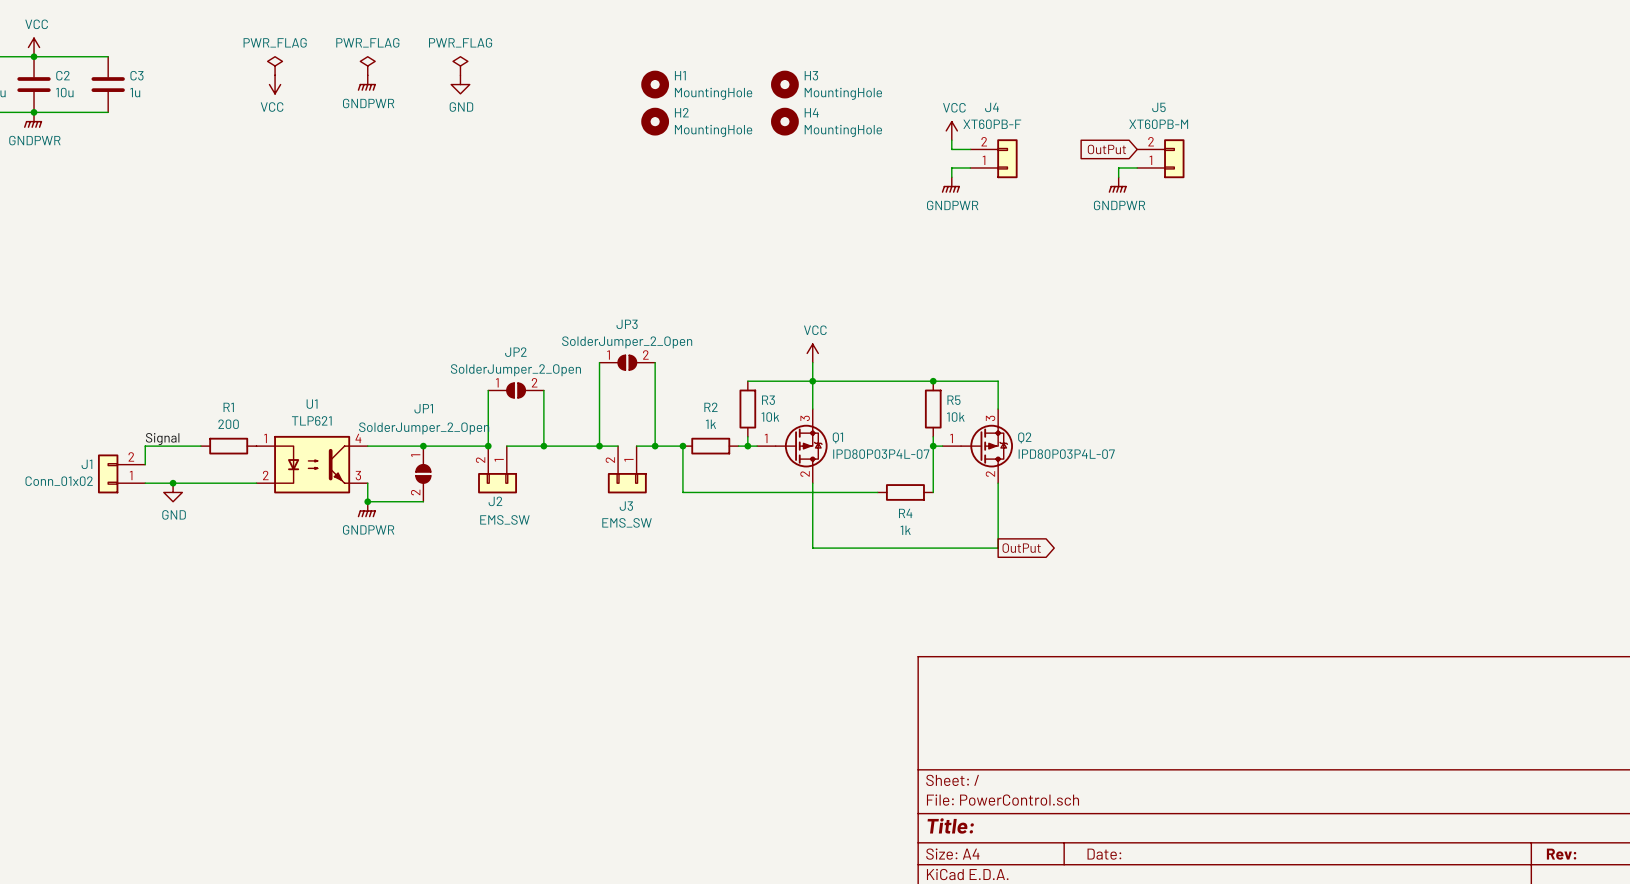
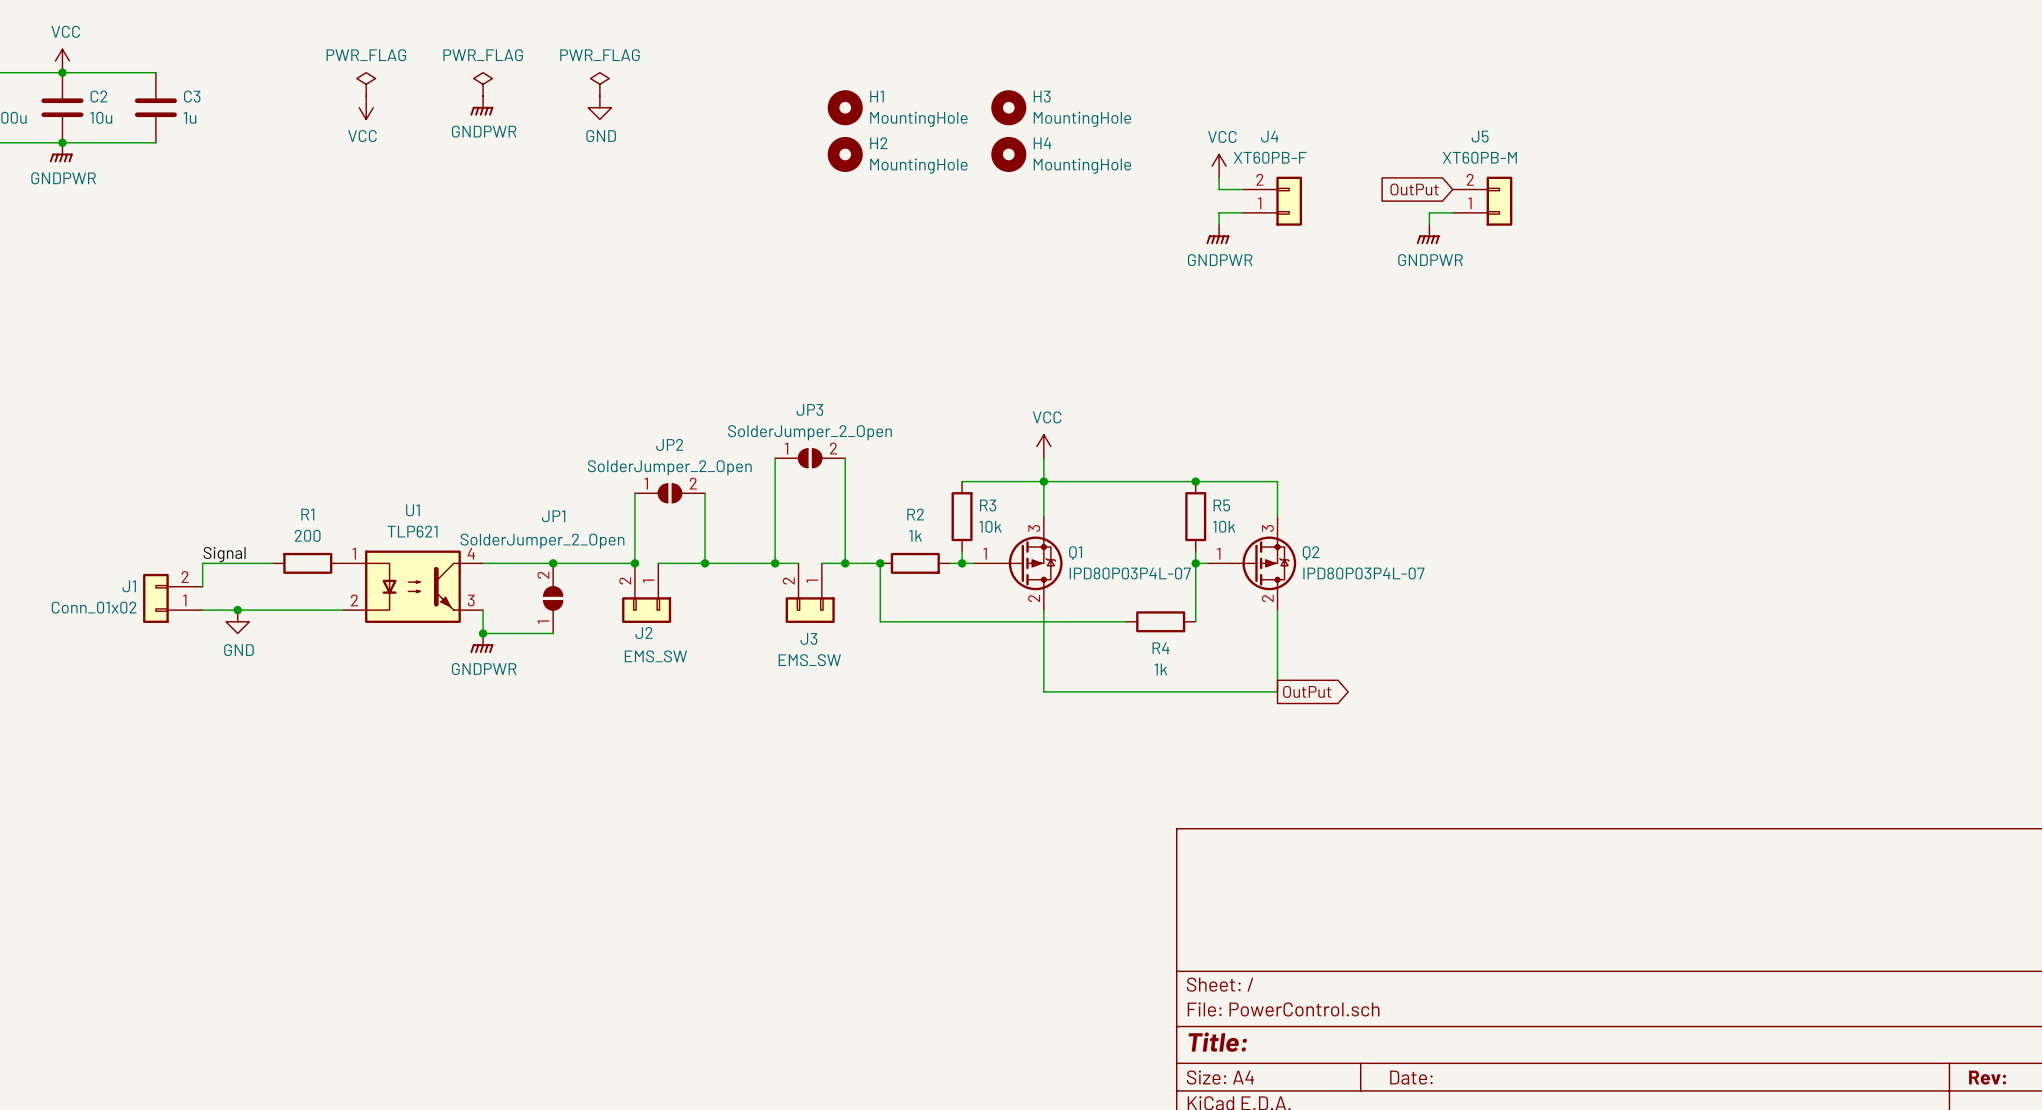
JP1 rotation: 0° (423, 473) -> 180° (553, 598)

